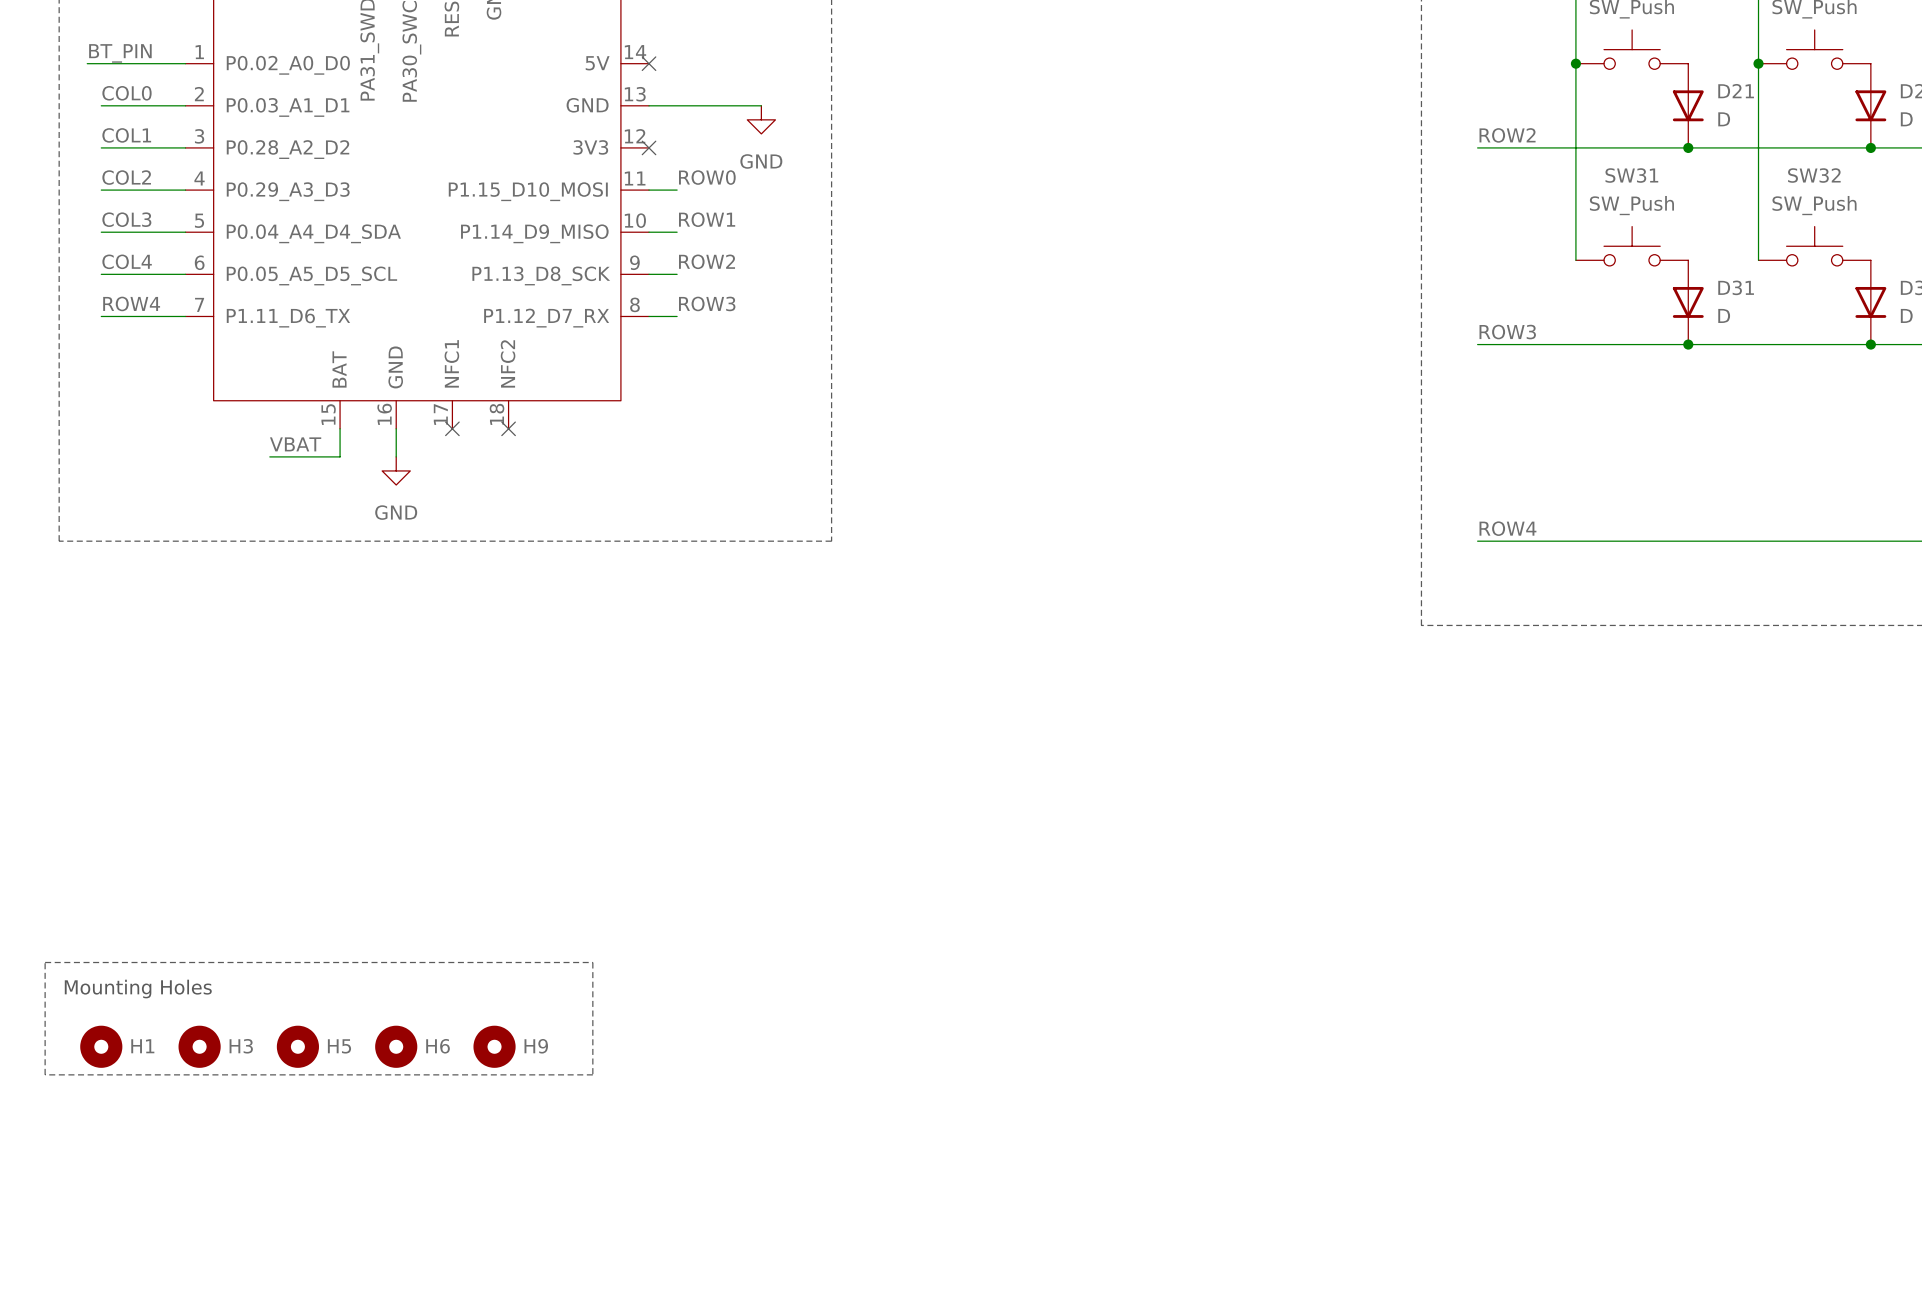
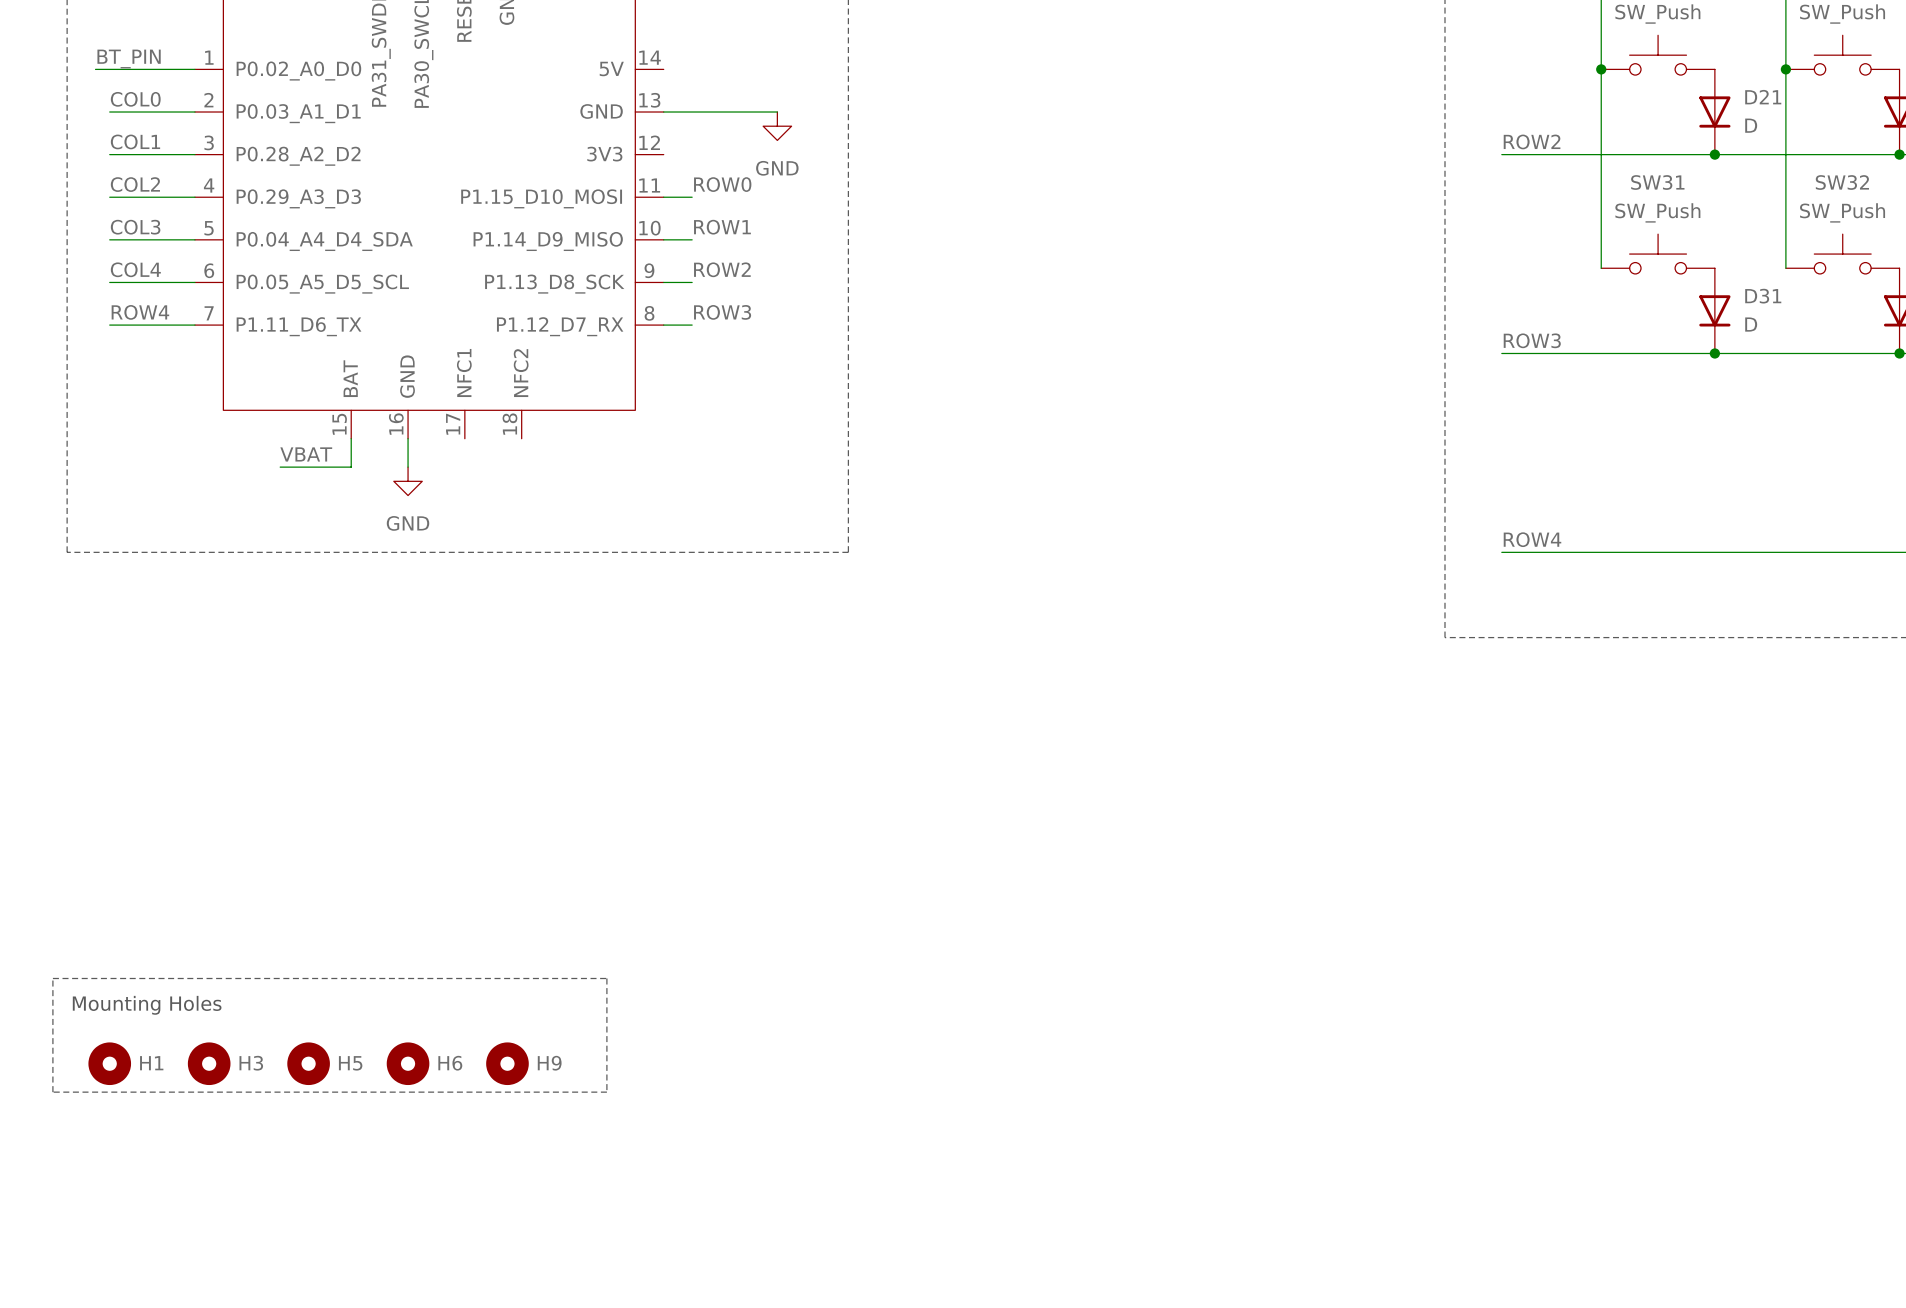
no-connect mark: (649, 63) -> none
no-connect mark: (649, 147) -> none
no-connect mark: (452, 428) -> none
no-connect mark: (508, 428) -> none

